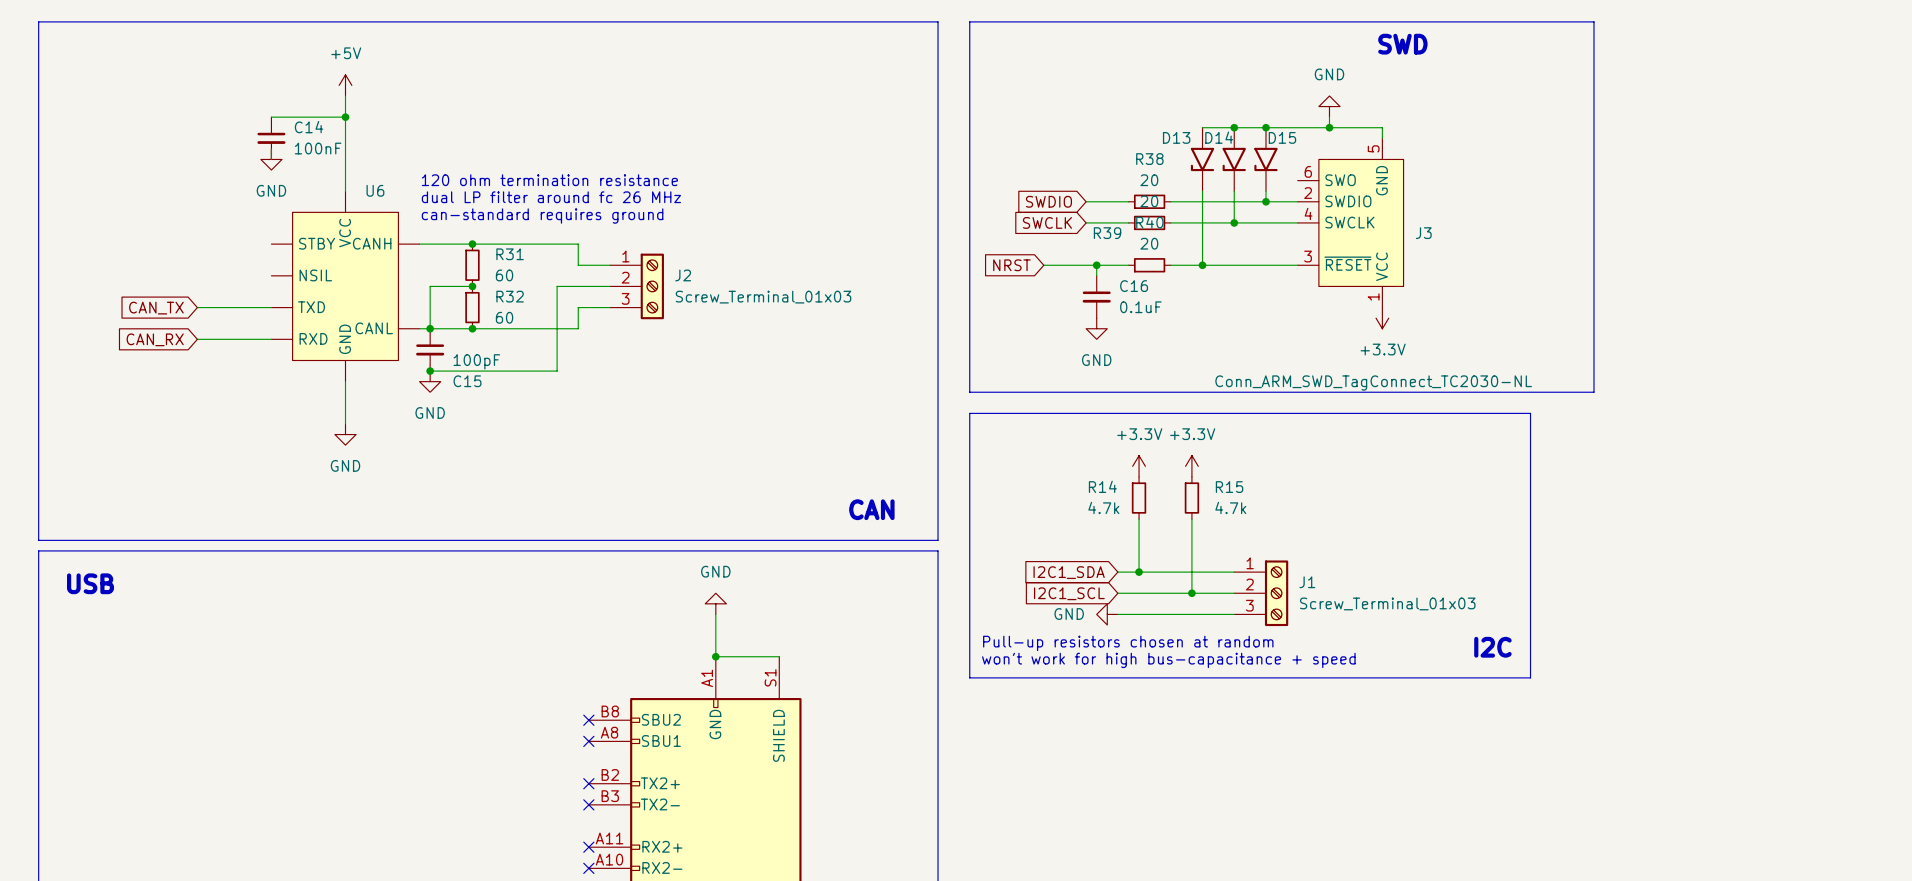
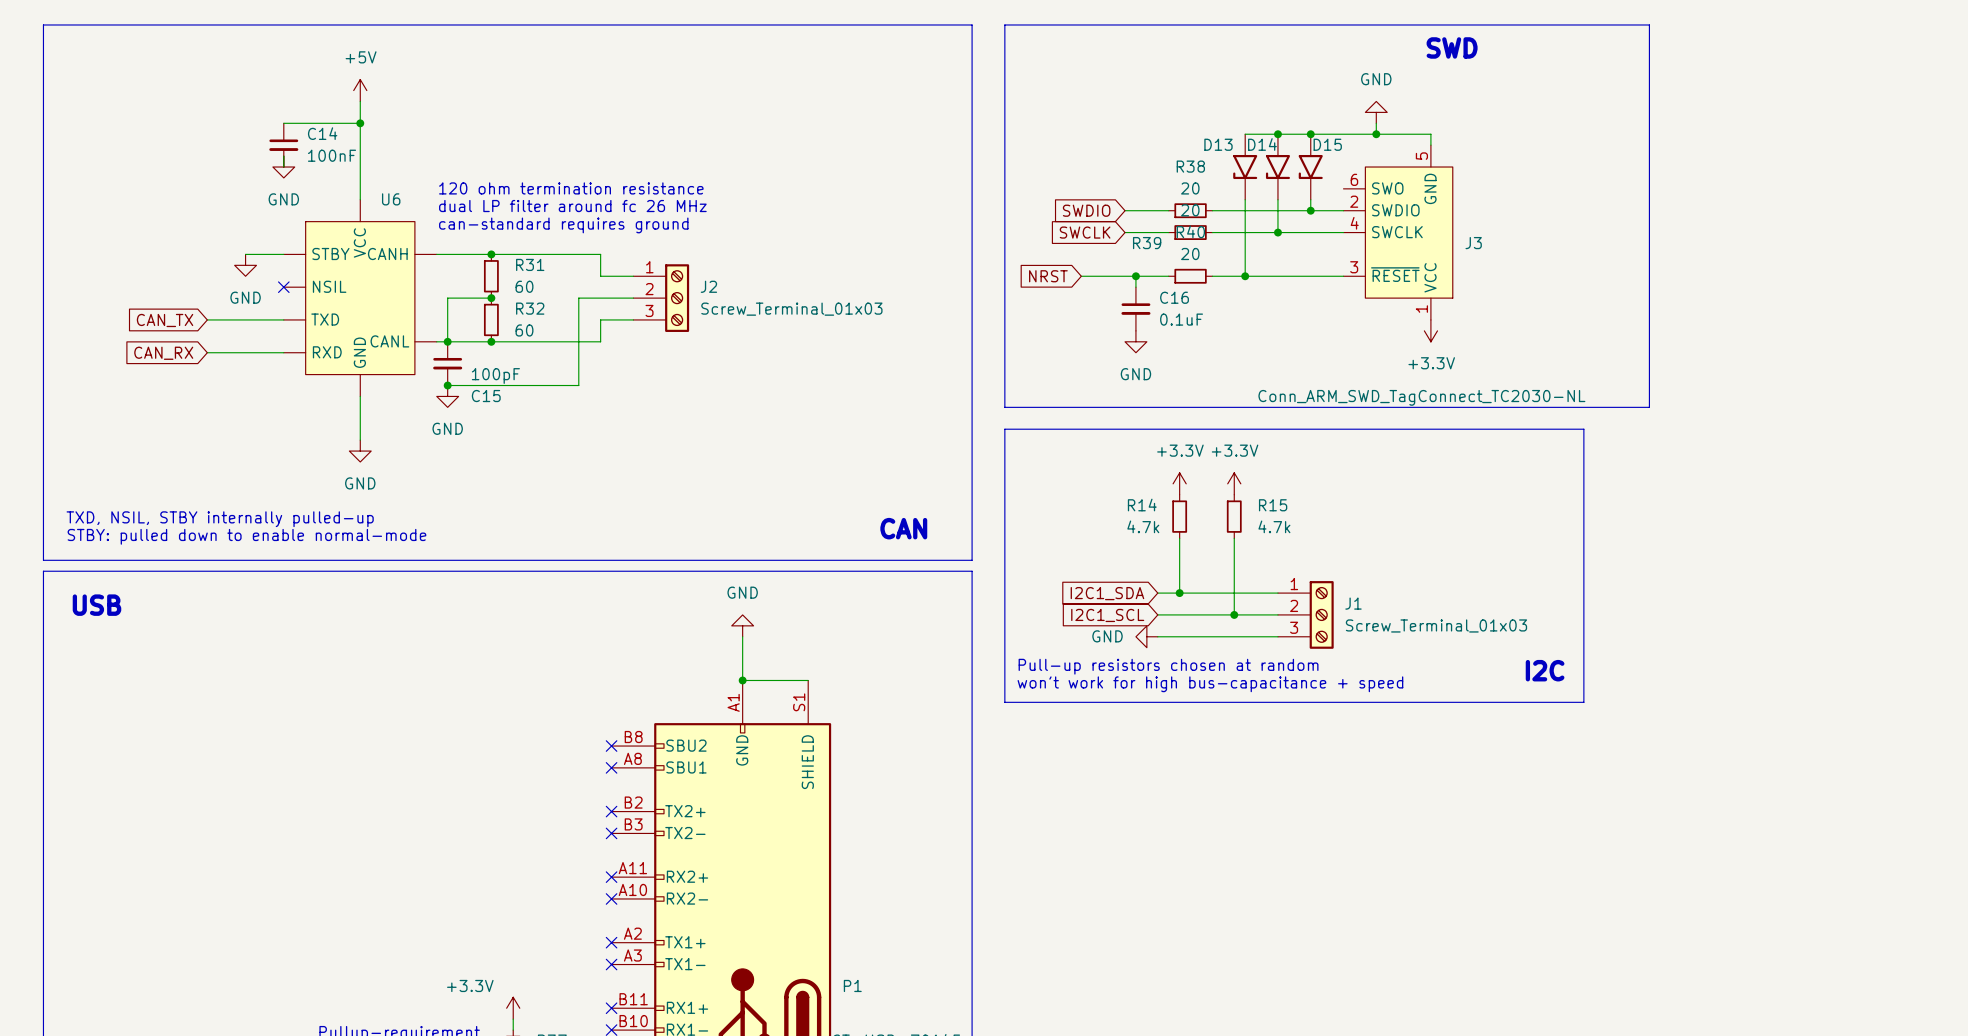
wire: none -> (245, 254) (283, 254)
power symbol: none -> GND (245, 265)
no-connect mark: none -> (283, 287)
text: none -> TXD, NSIL, STBY internally pulled-up (220, 519)
text: none -> STBY: pulled down to enable normal-mode (246, 536)

